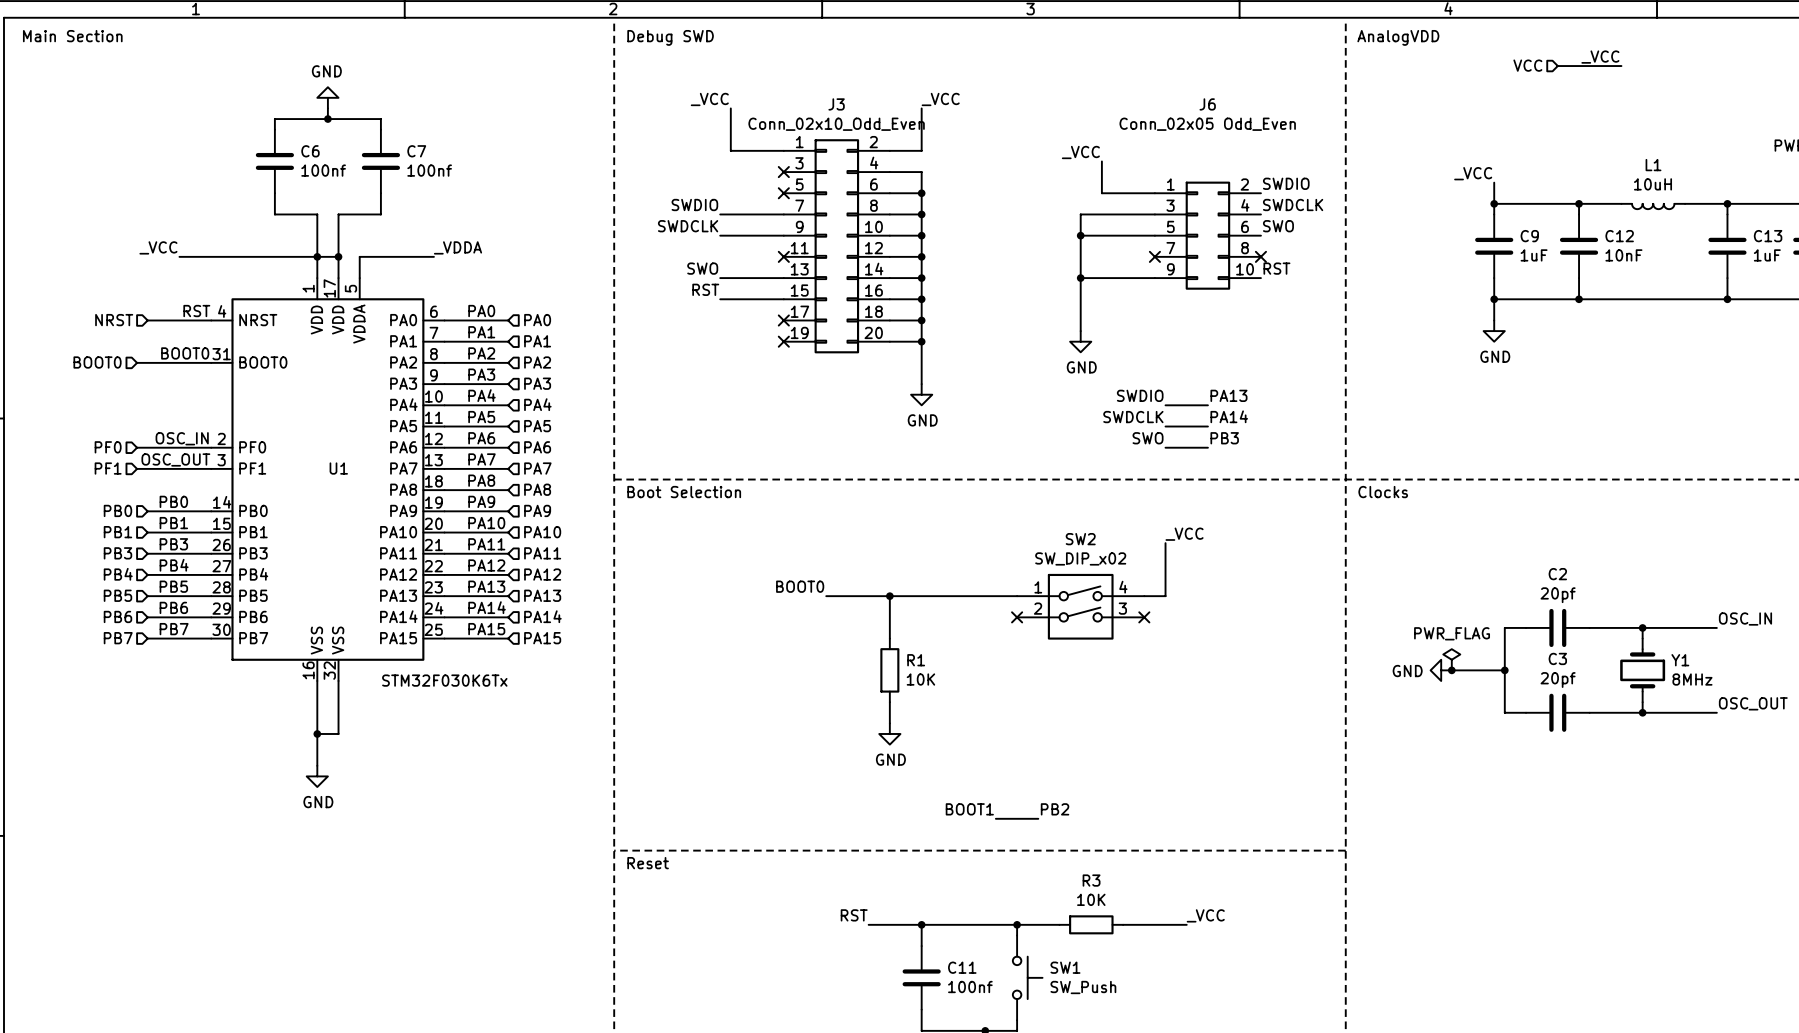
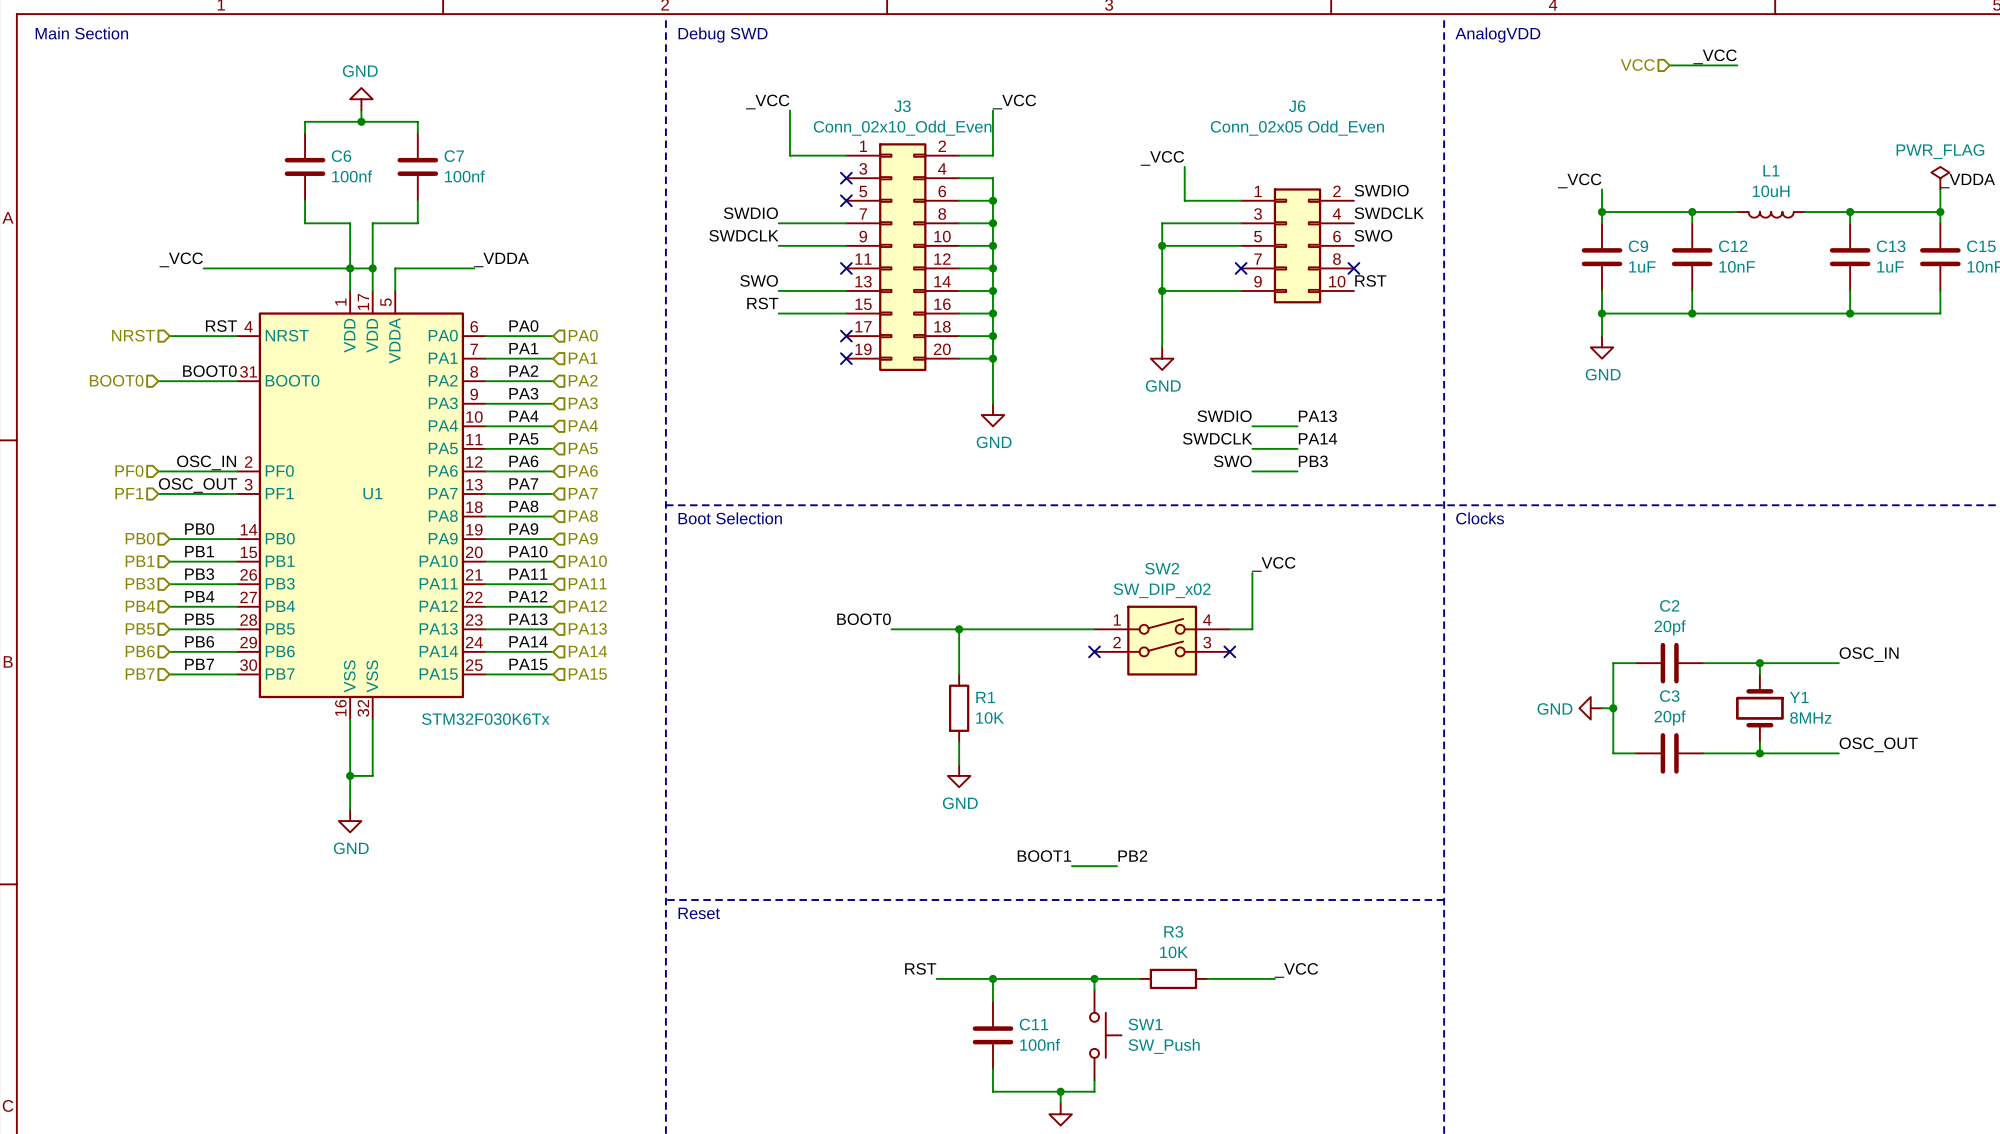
power symbol: PWR_FLAG (1451, 659) -> none
power symbol position: GND (1441, 670) -> GND (1590, 708)
wire: (1451, 670) (1494, 670) -> none
junction: (1451, 670) -> none

